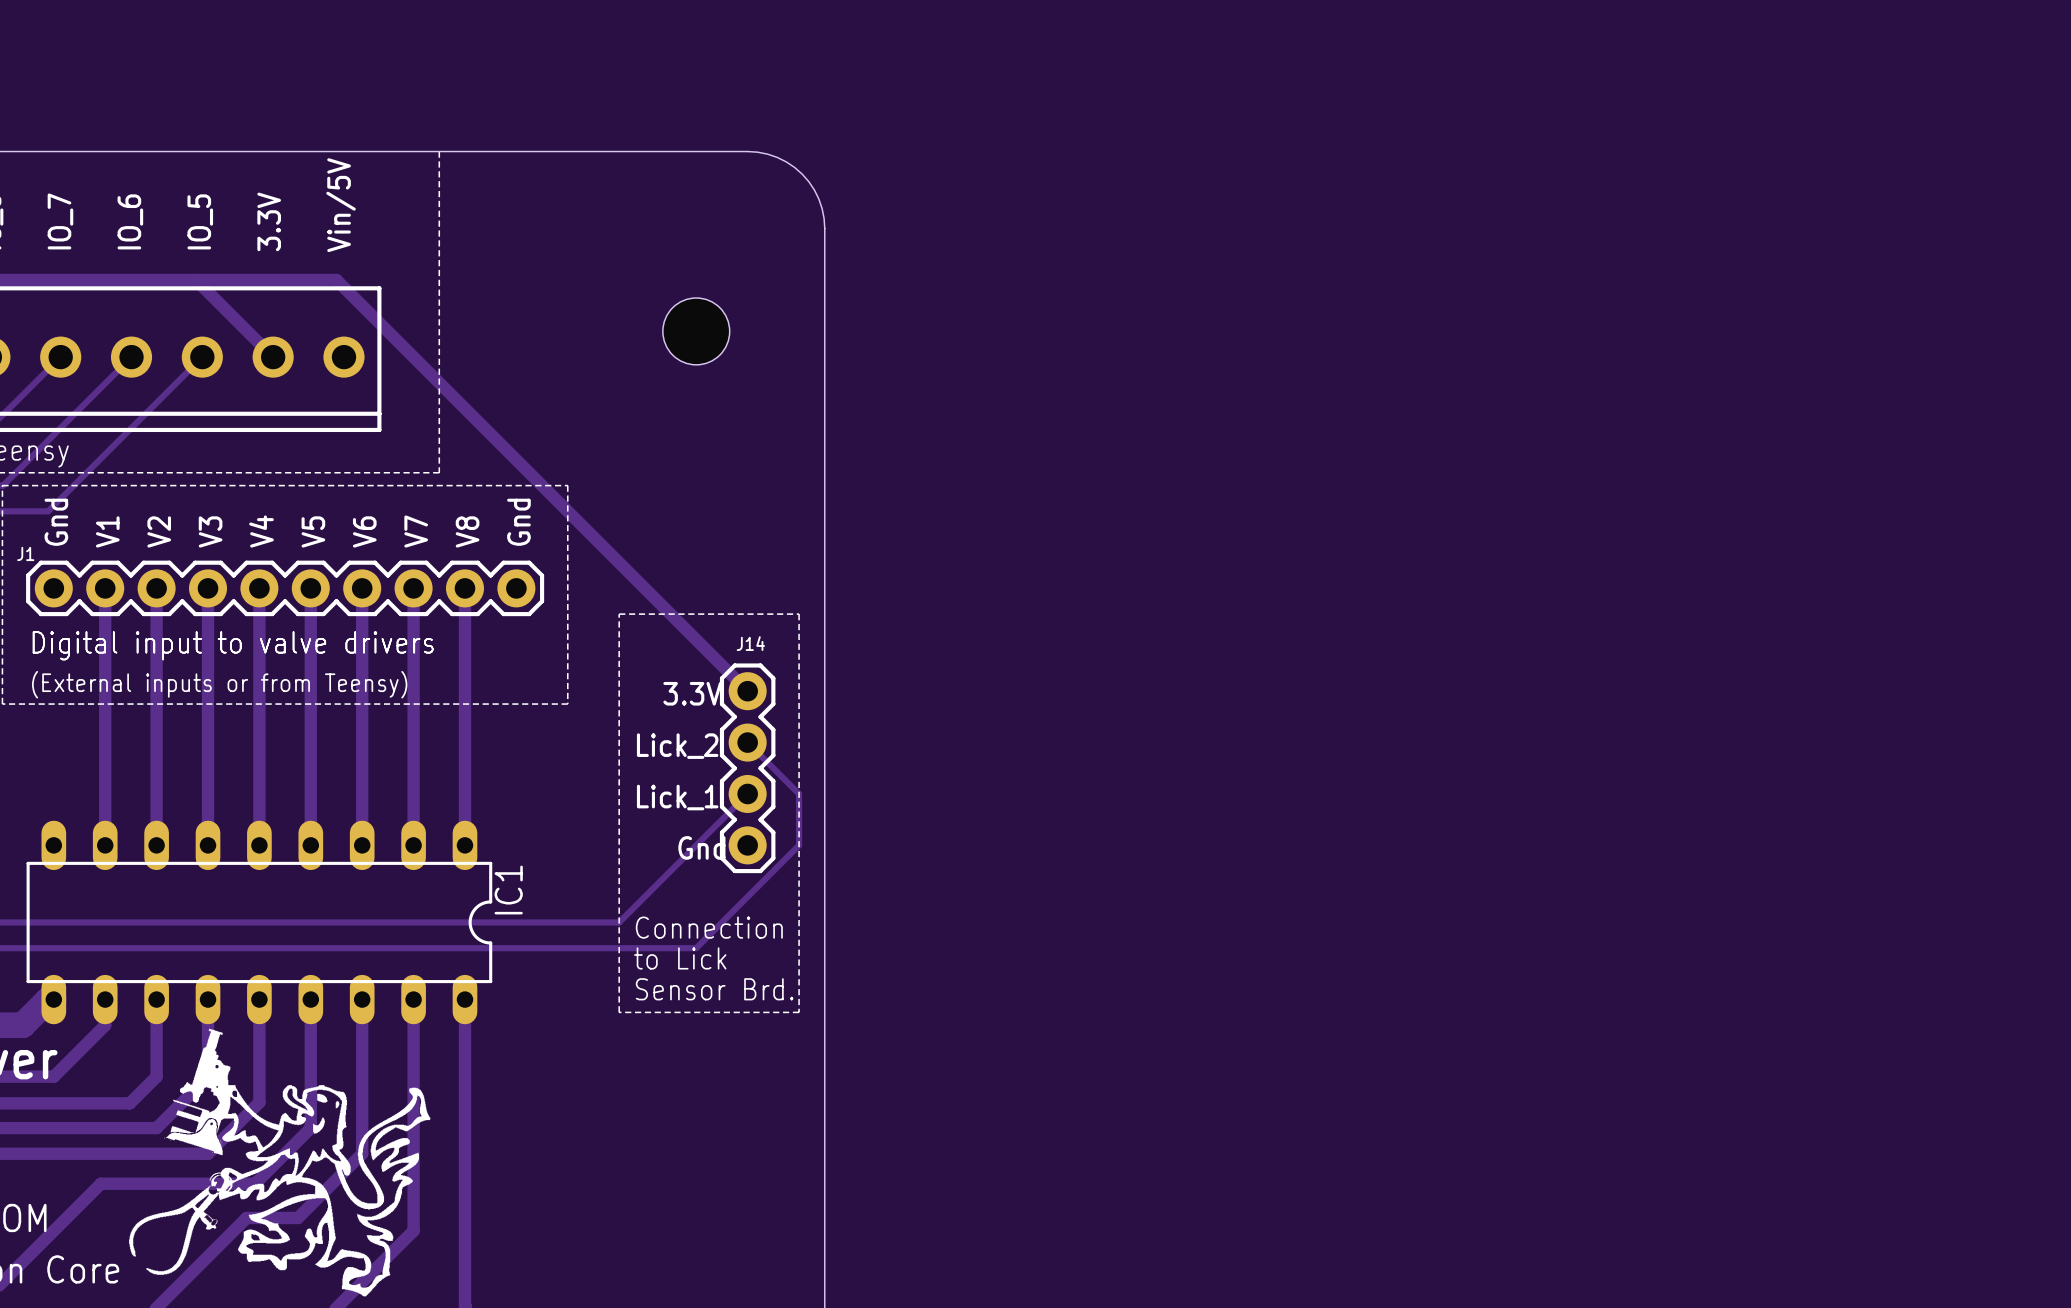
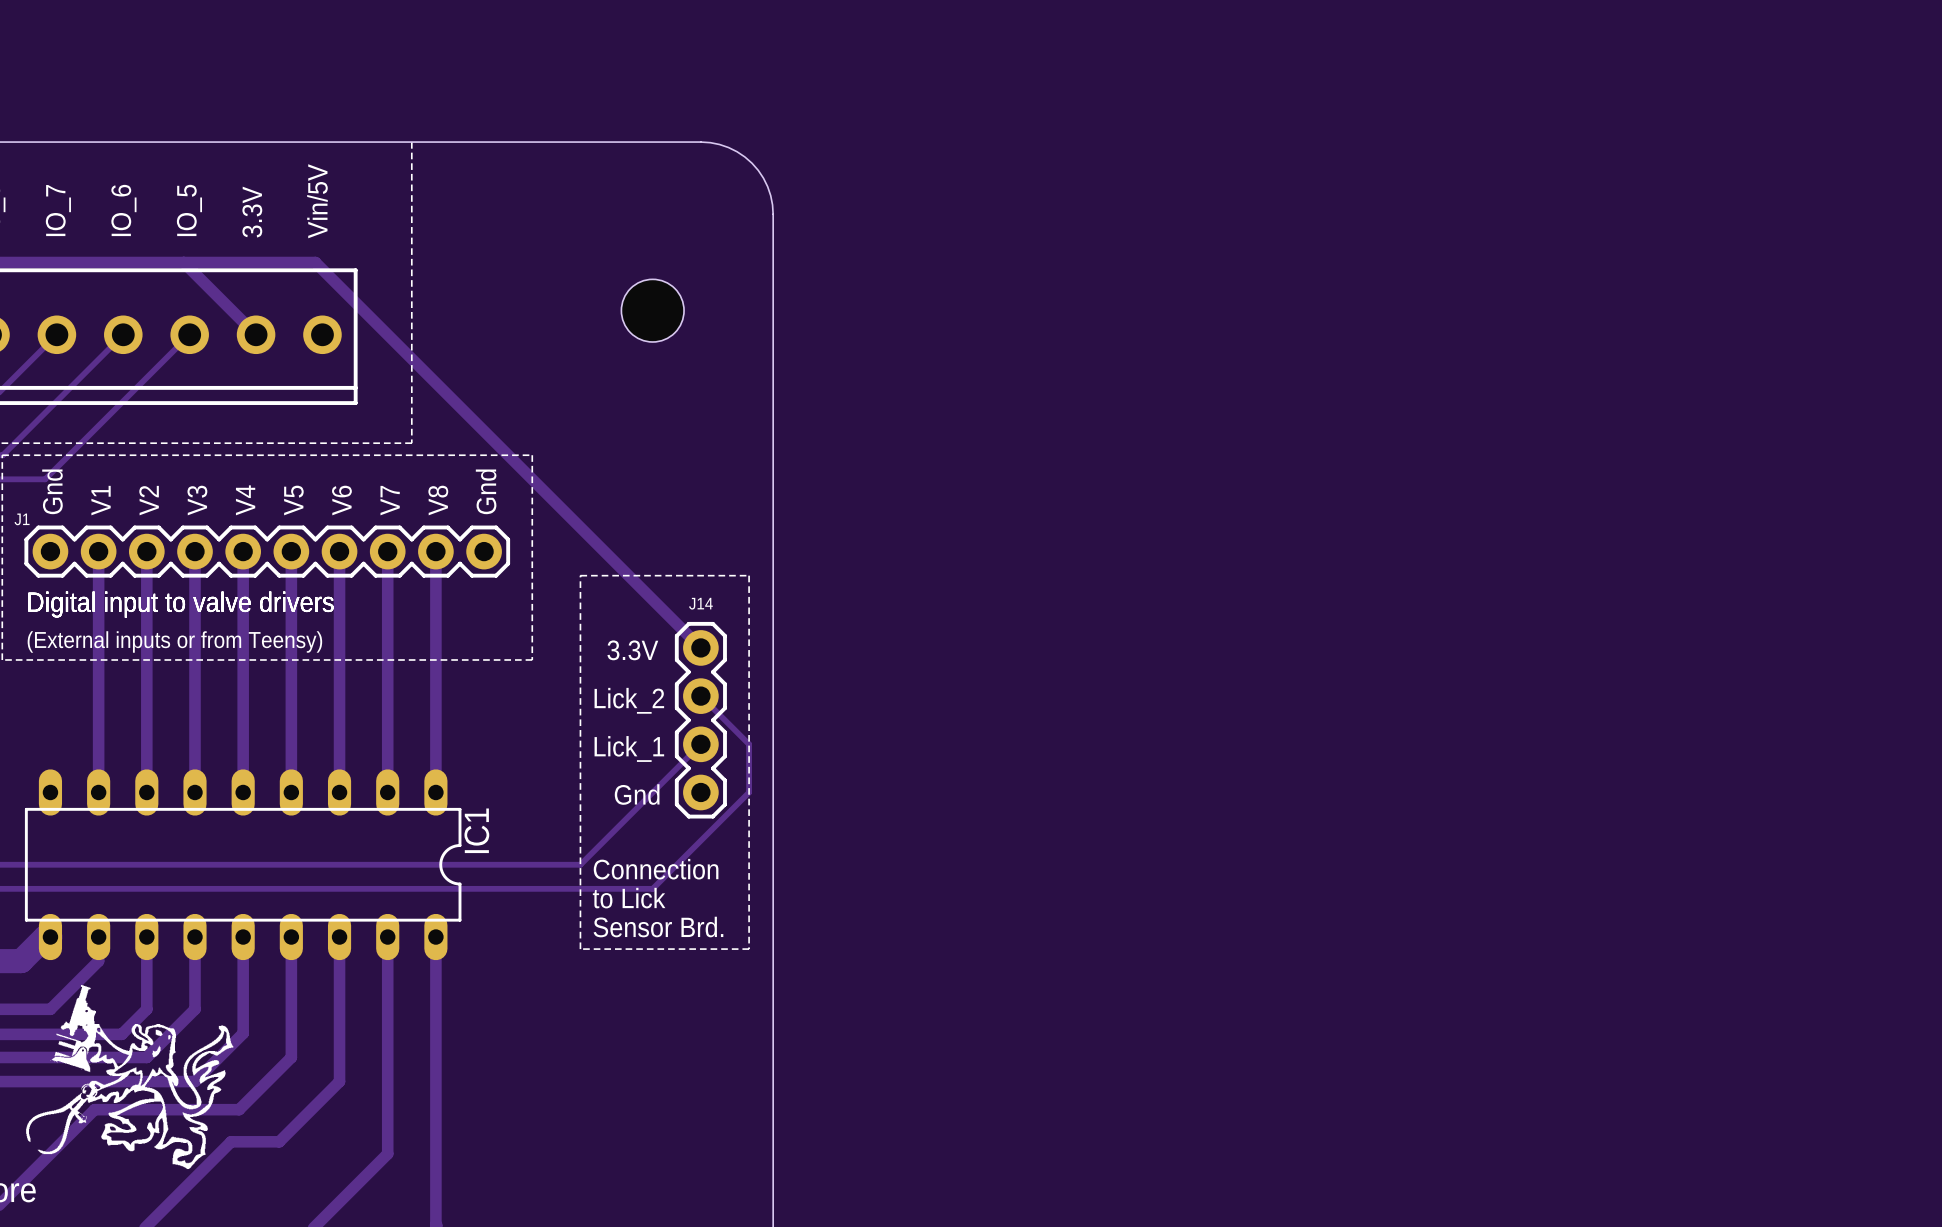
drawing: [129, 1028, 431, 1297] -> none
drawing: none -> [26, 984, 234, 1170]

